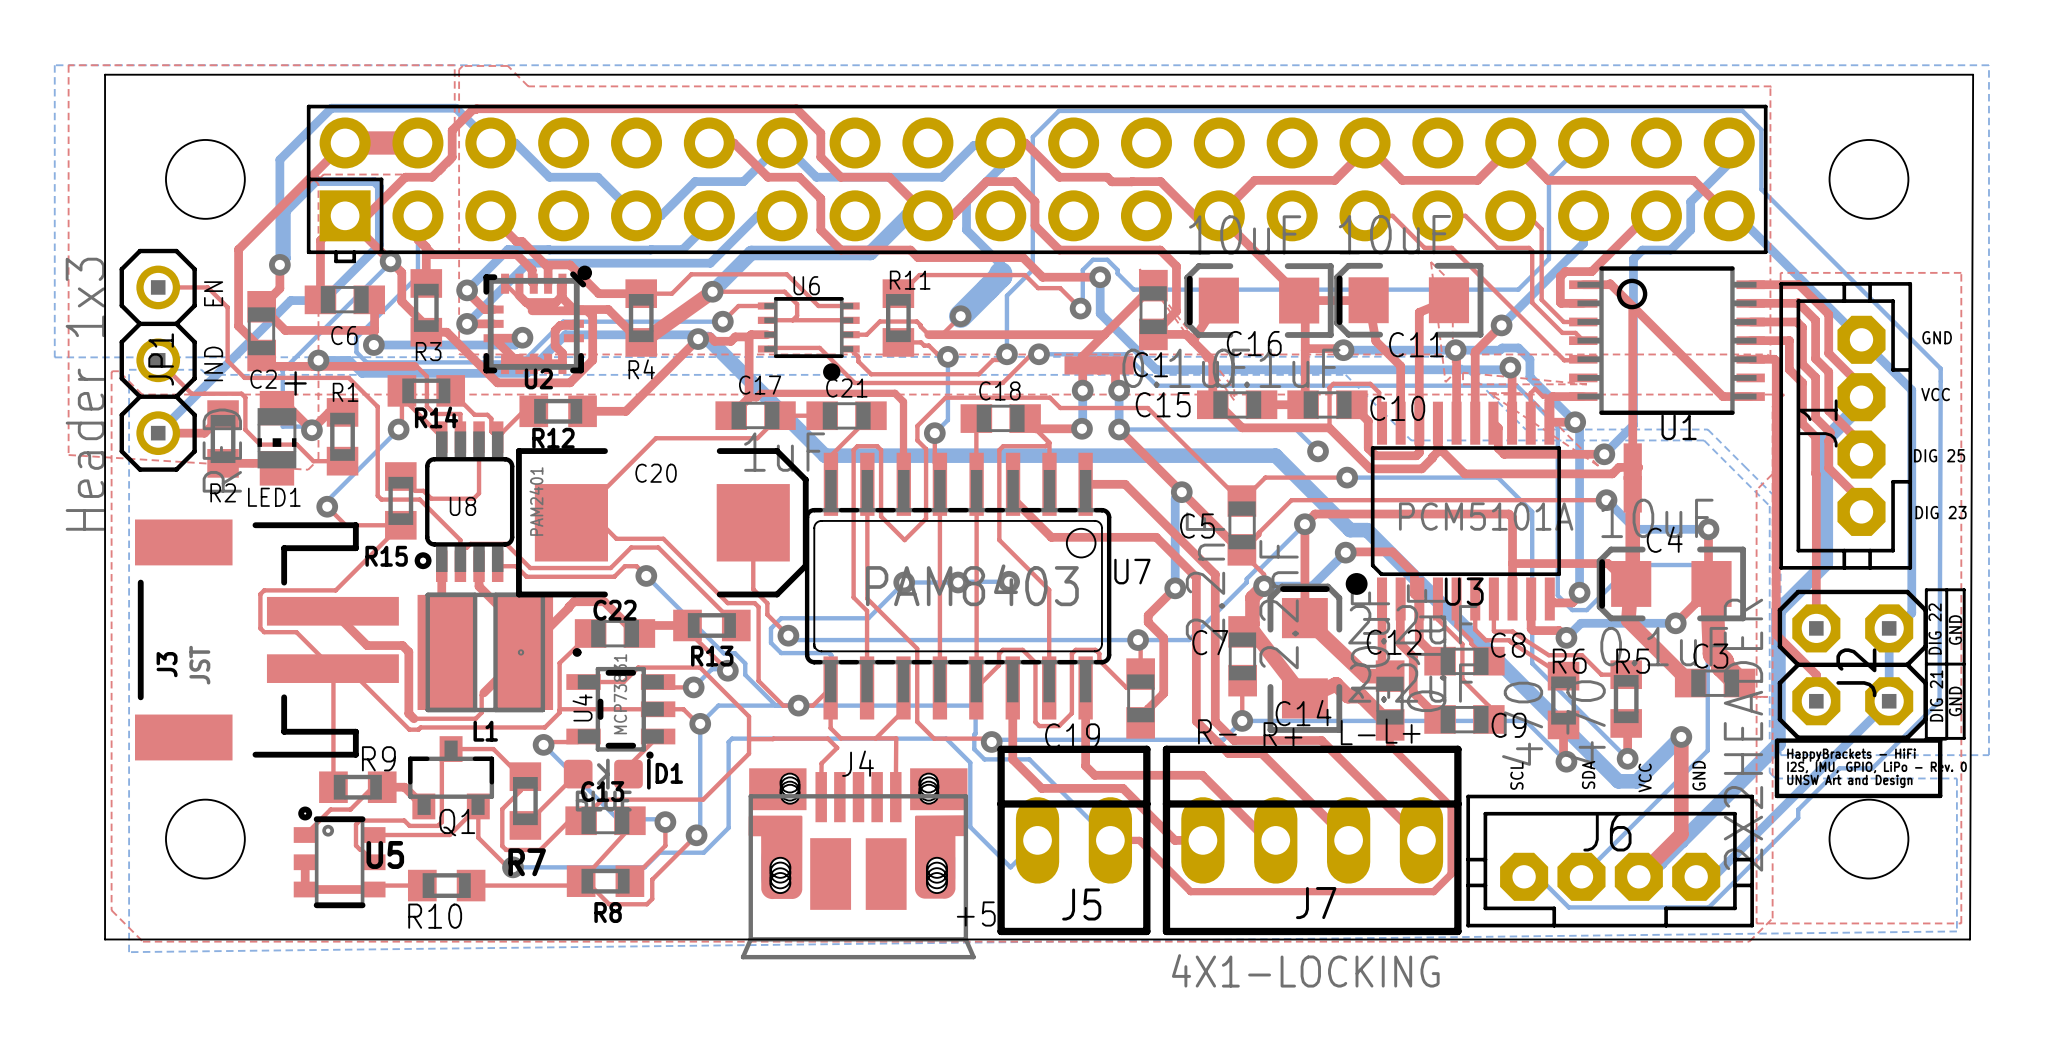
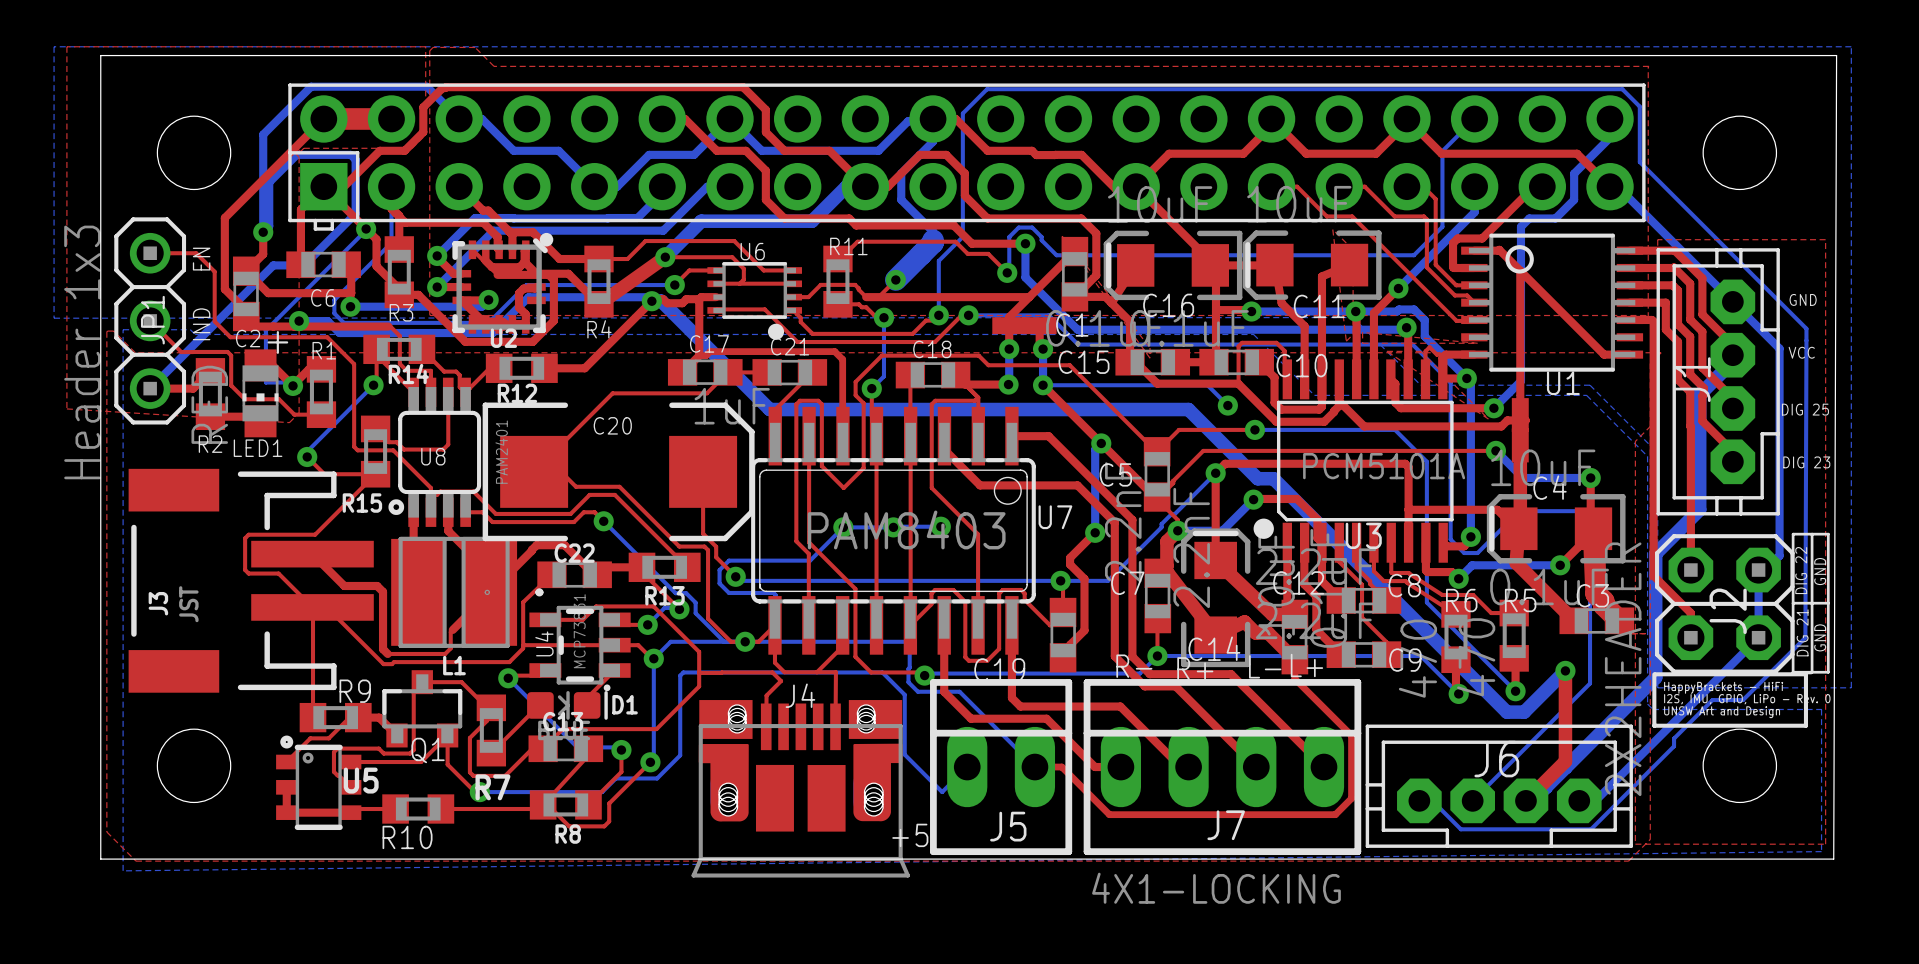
text: SDA (1588, 774) -> none
text: SCL (1516, 775) -> none
text: GND (1699, 775) -> none
text: VCC (1645, 777) -> none

